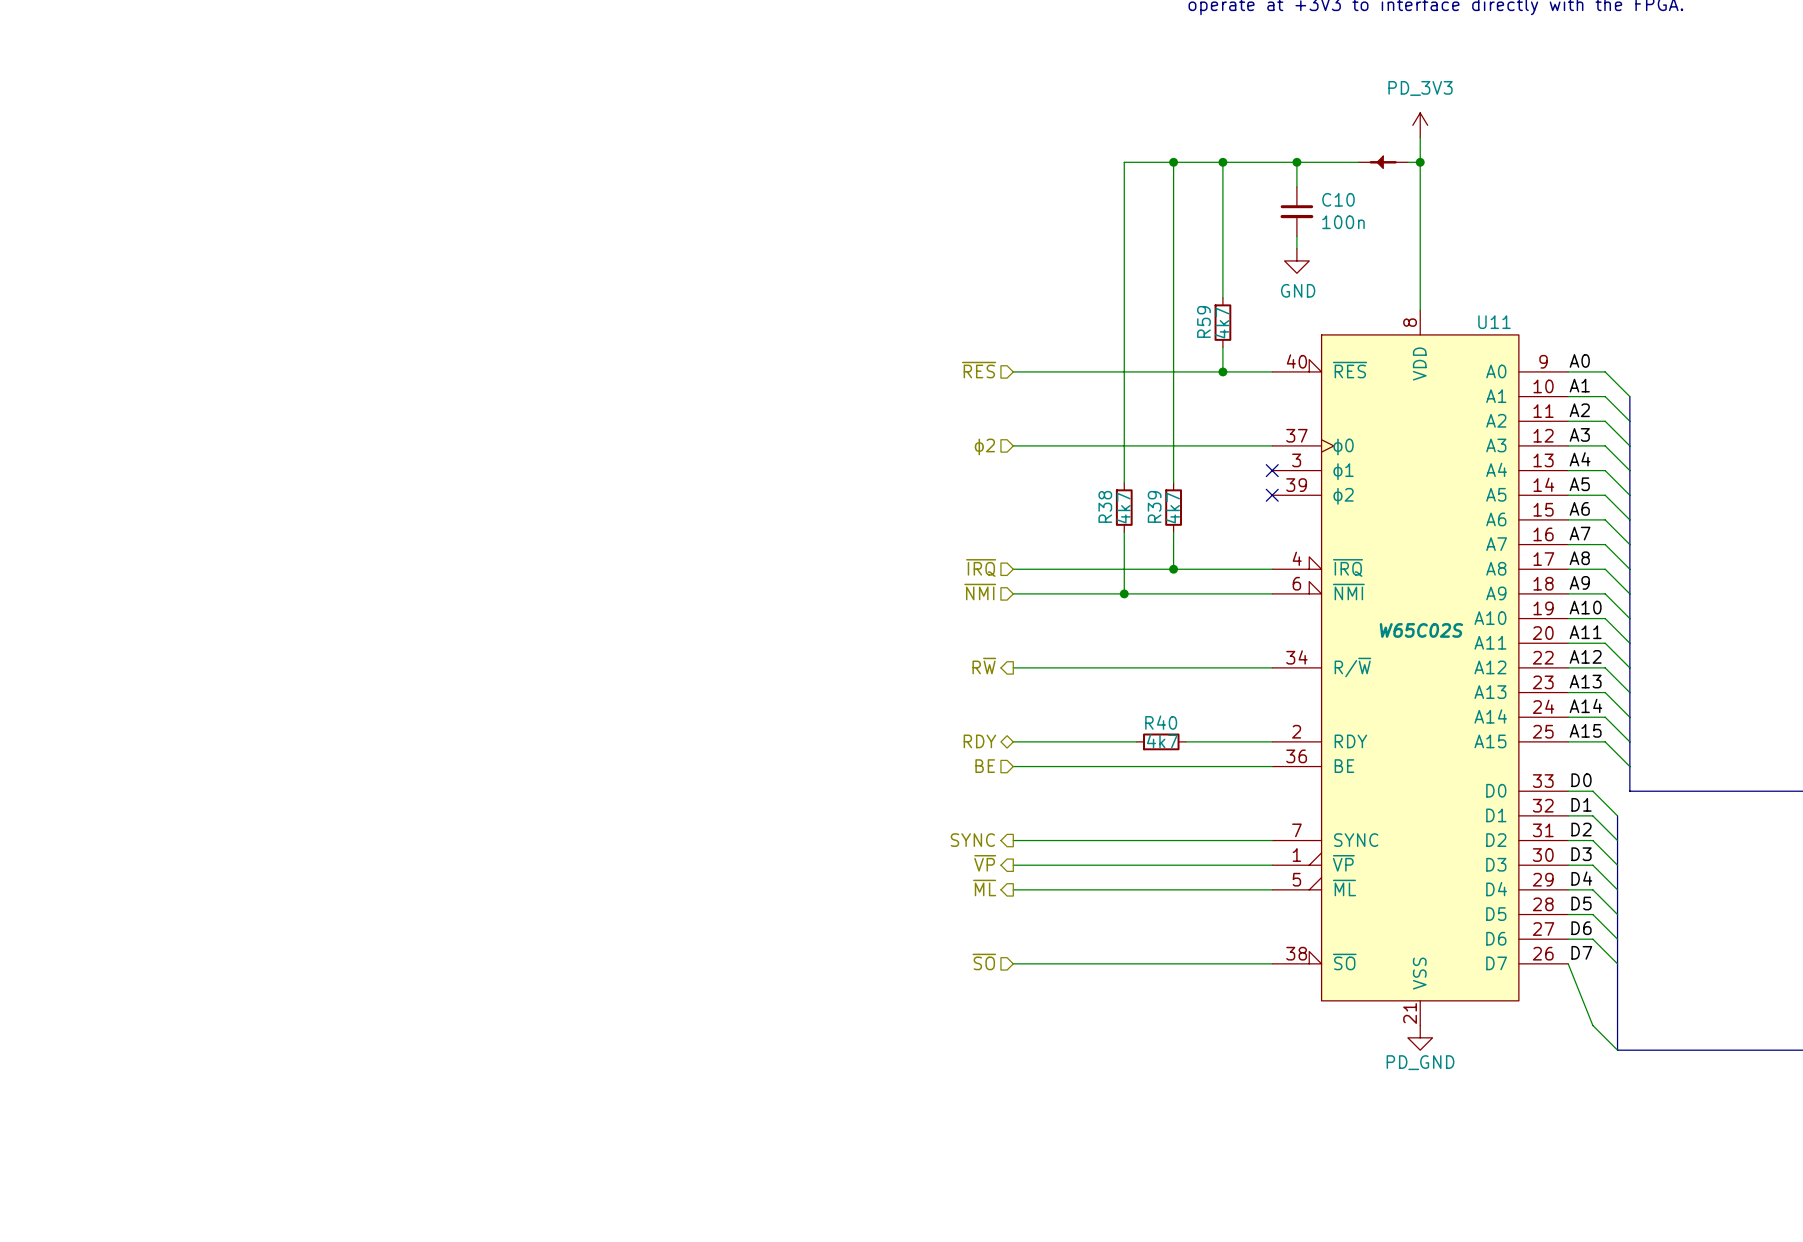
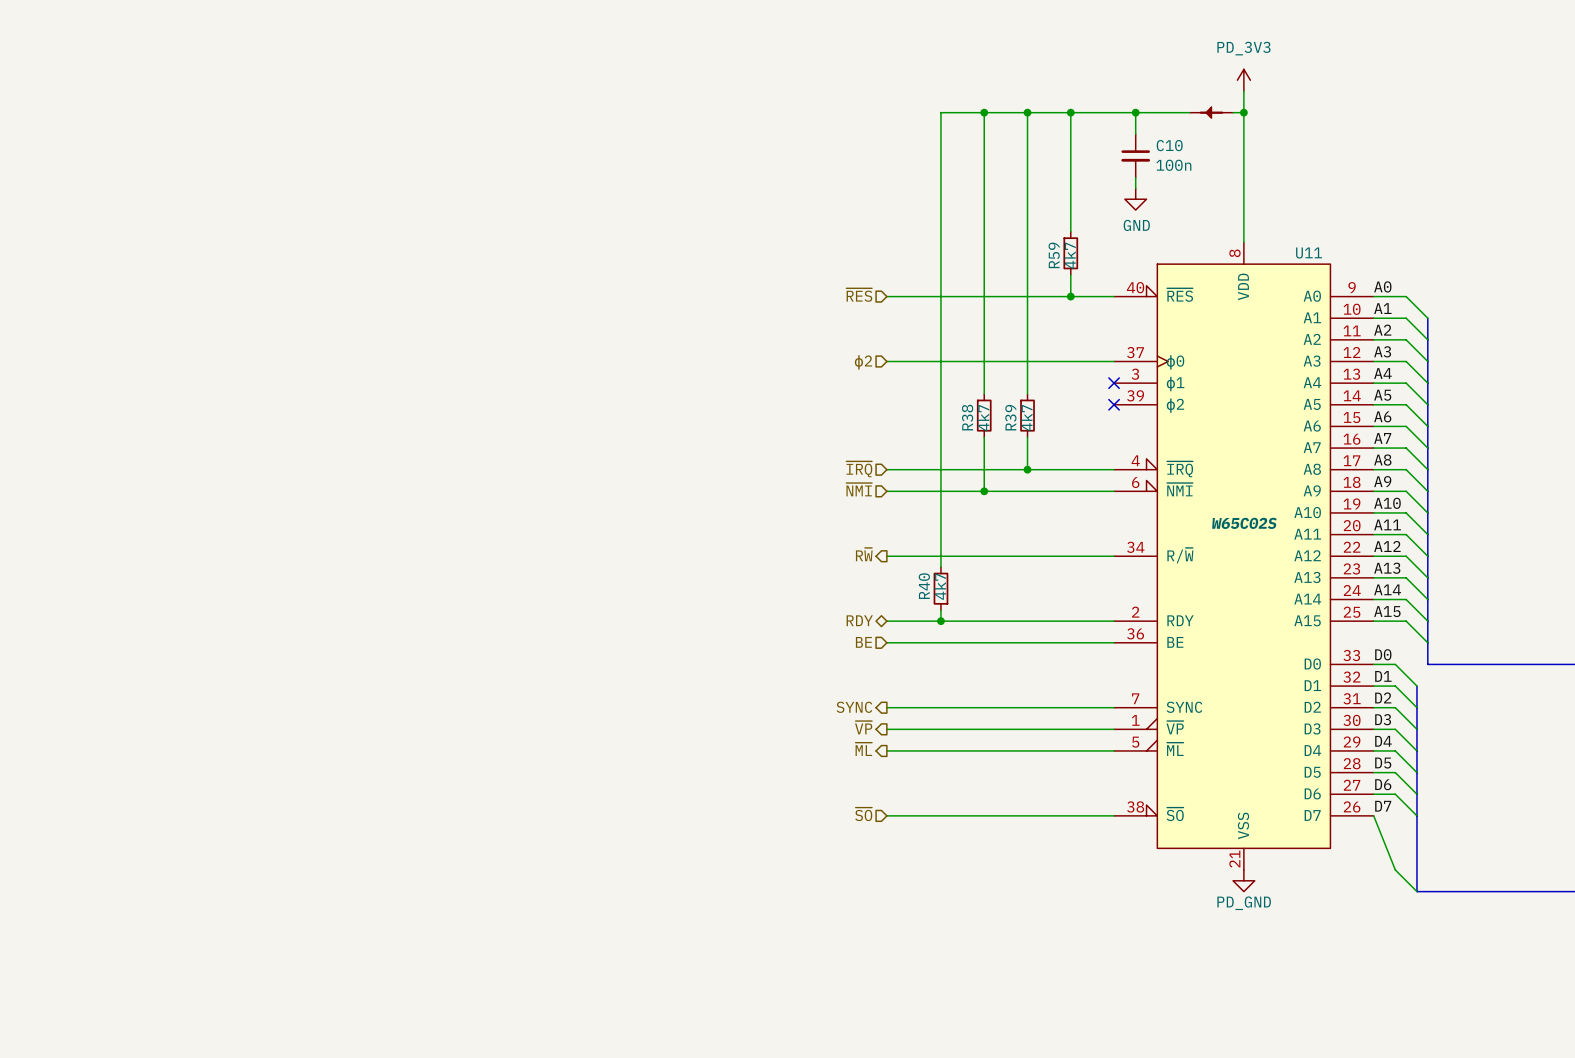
wire: none -> (984, 112) (940, 112) (940, 567)
junction: none -> (984, 112)
R40 name position: R40 (1161, 722) -> R40 (924, 586)
wire: none -> (940, 610) (940, 621)
junction: none -> (940, 621)
R40 rotation: 0° (1161, 741) -> 90° clockwise (940, 588)
R40 position: (1161, 741) -> (940, 588)

